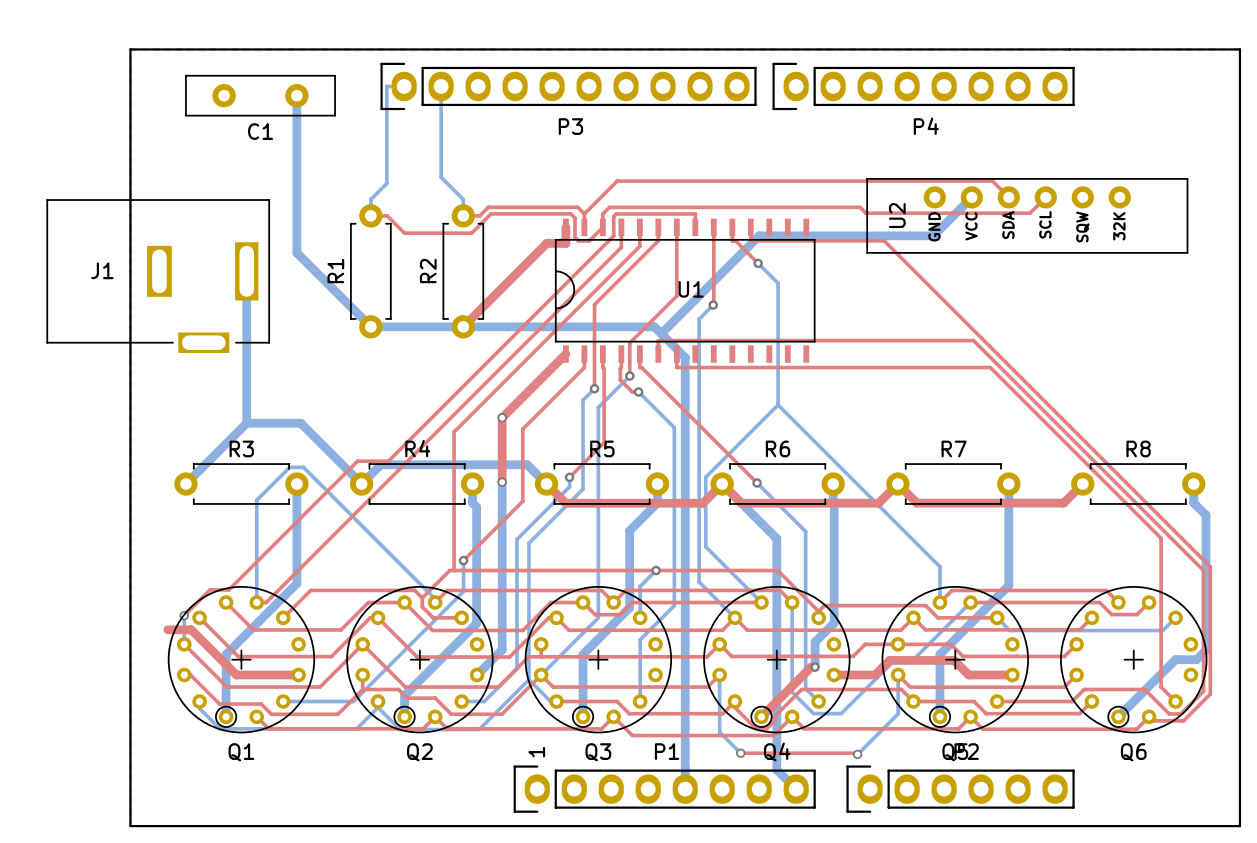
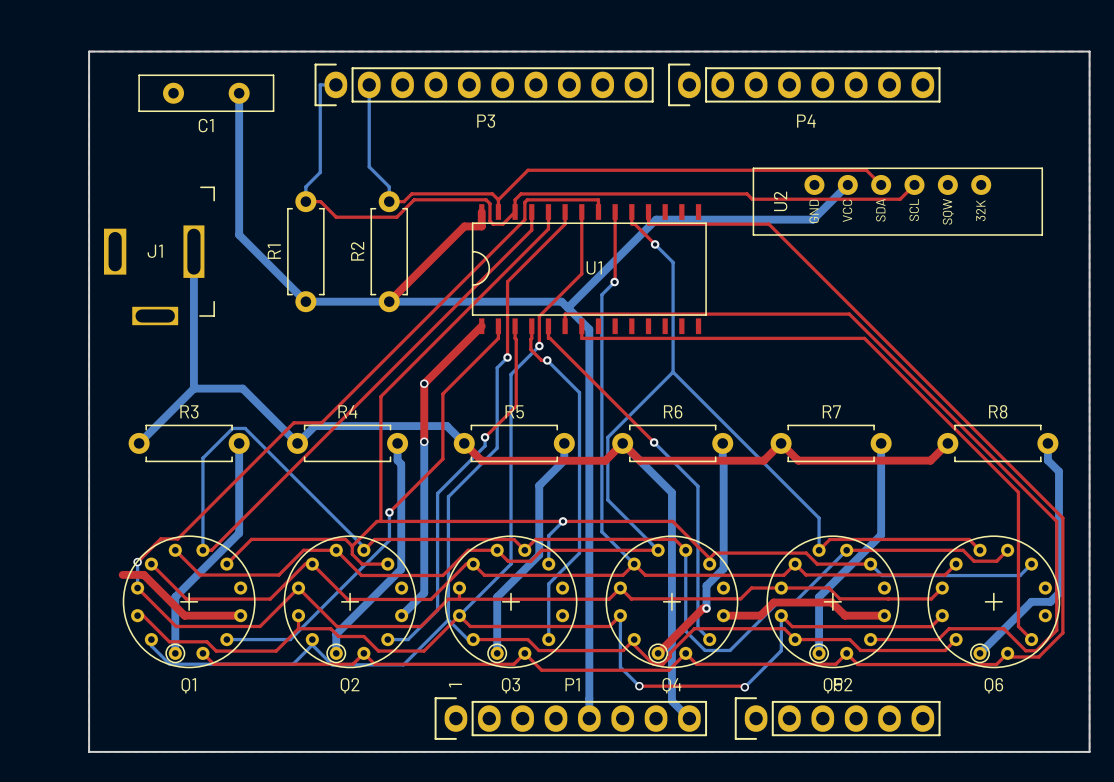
J1 footprint: [46, 199, 271, 353] -> [103, 186, 215, 326]
J1 name position: J1 (102, 270) -> J1 (155, 251)

